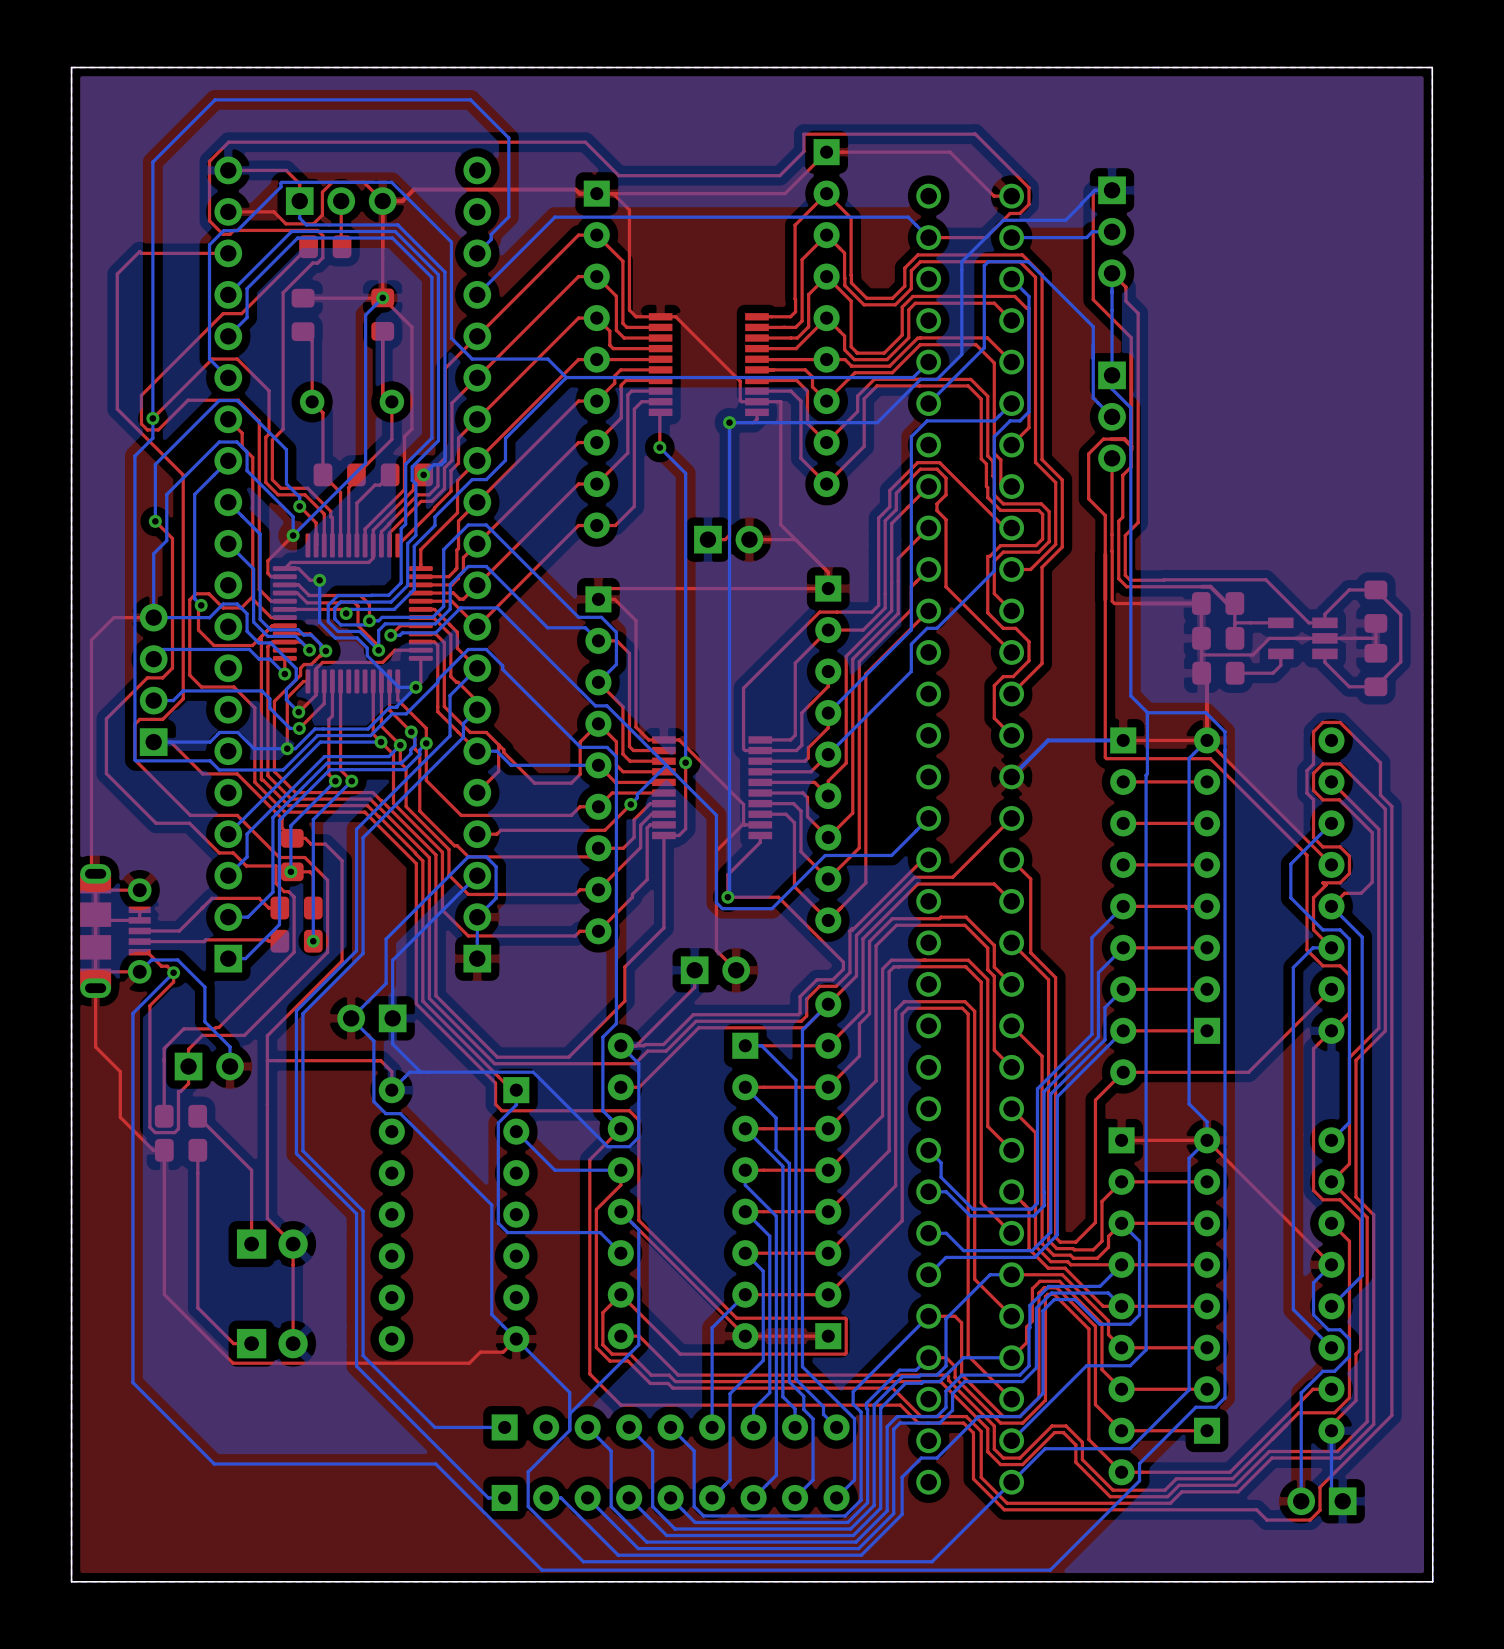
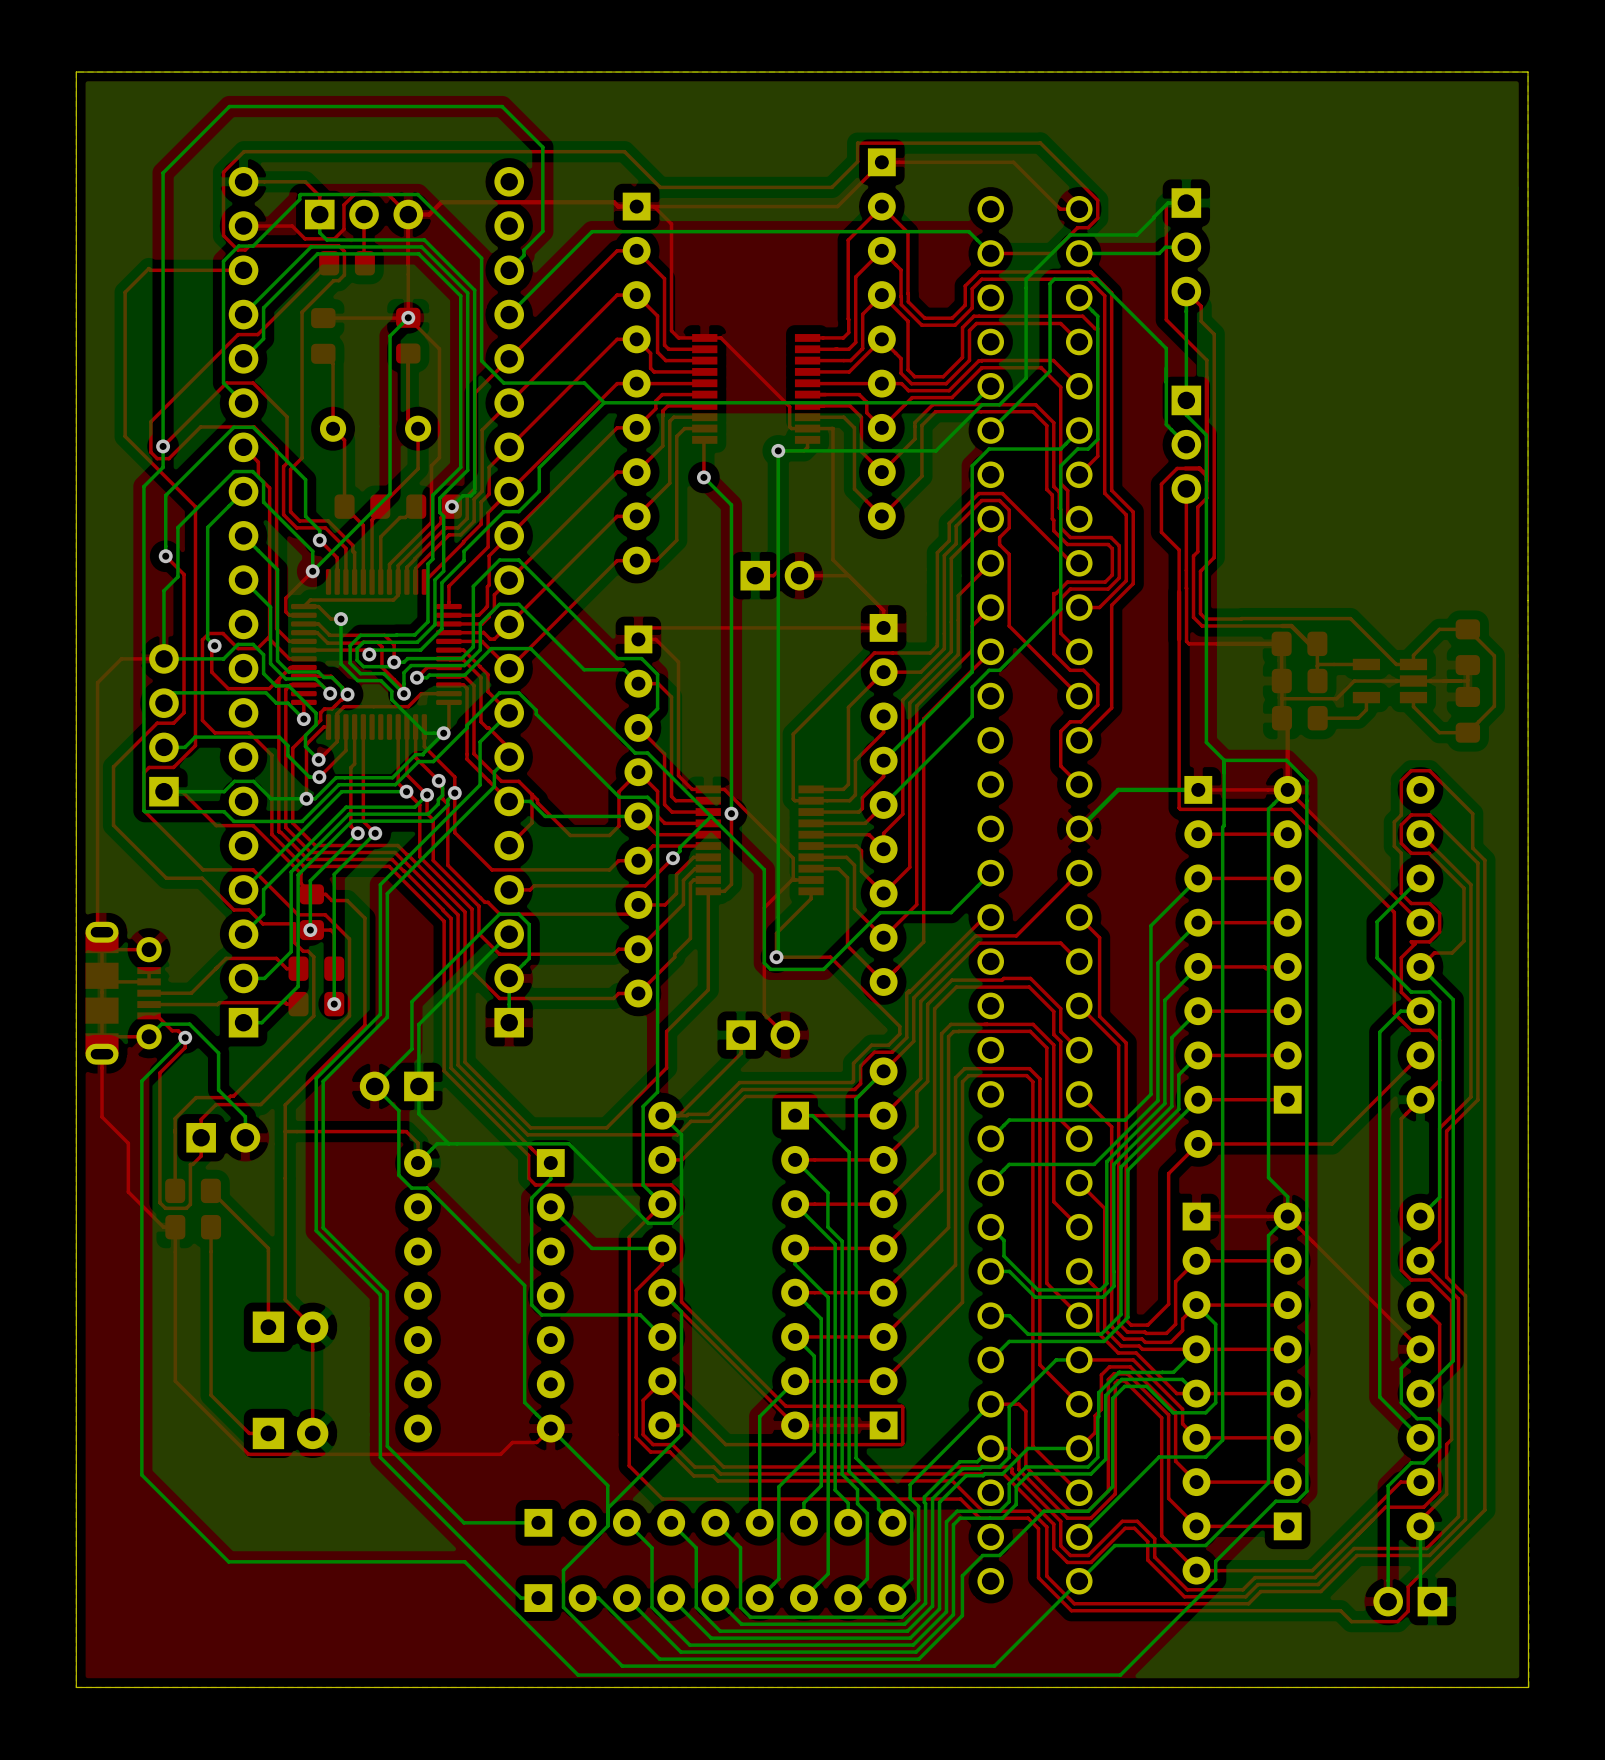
bottom track: none -> (1198, 878) (1150, 925) (1150, 1094) (1125, 1120) (1009, 1120) (990, 1138)
bottom track: none -> (1198, 922) (1157, 963) (1157, 1100) (1094, 1164) (1009, 1164) (990, 1182)

